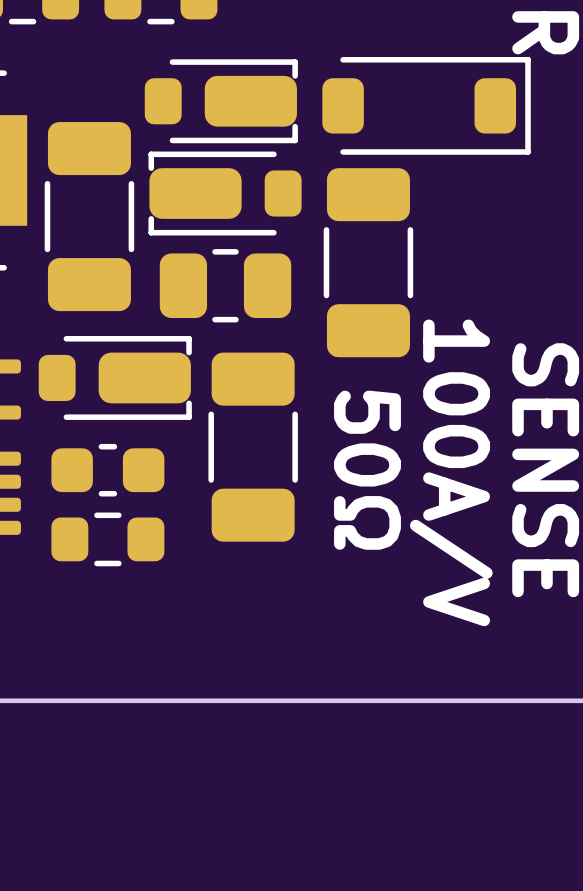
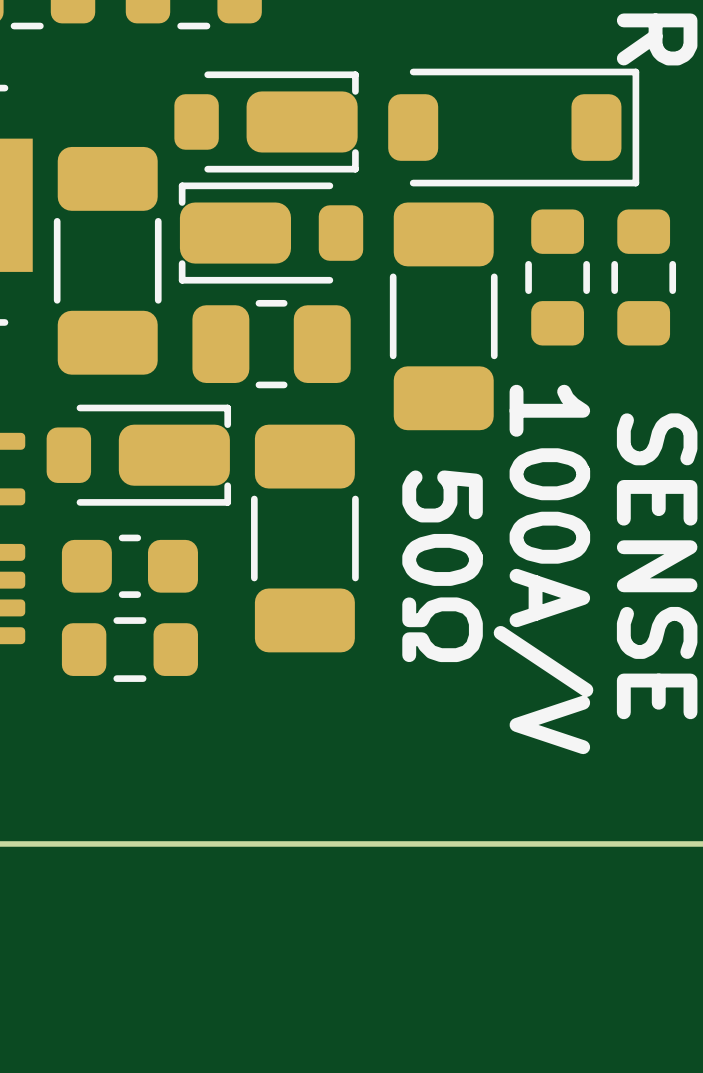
part: none -> (557, 277)
part: none -> (643, 277)

